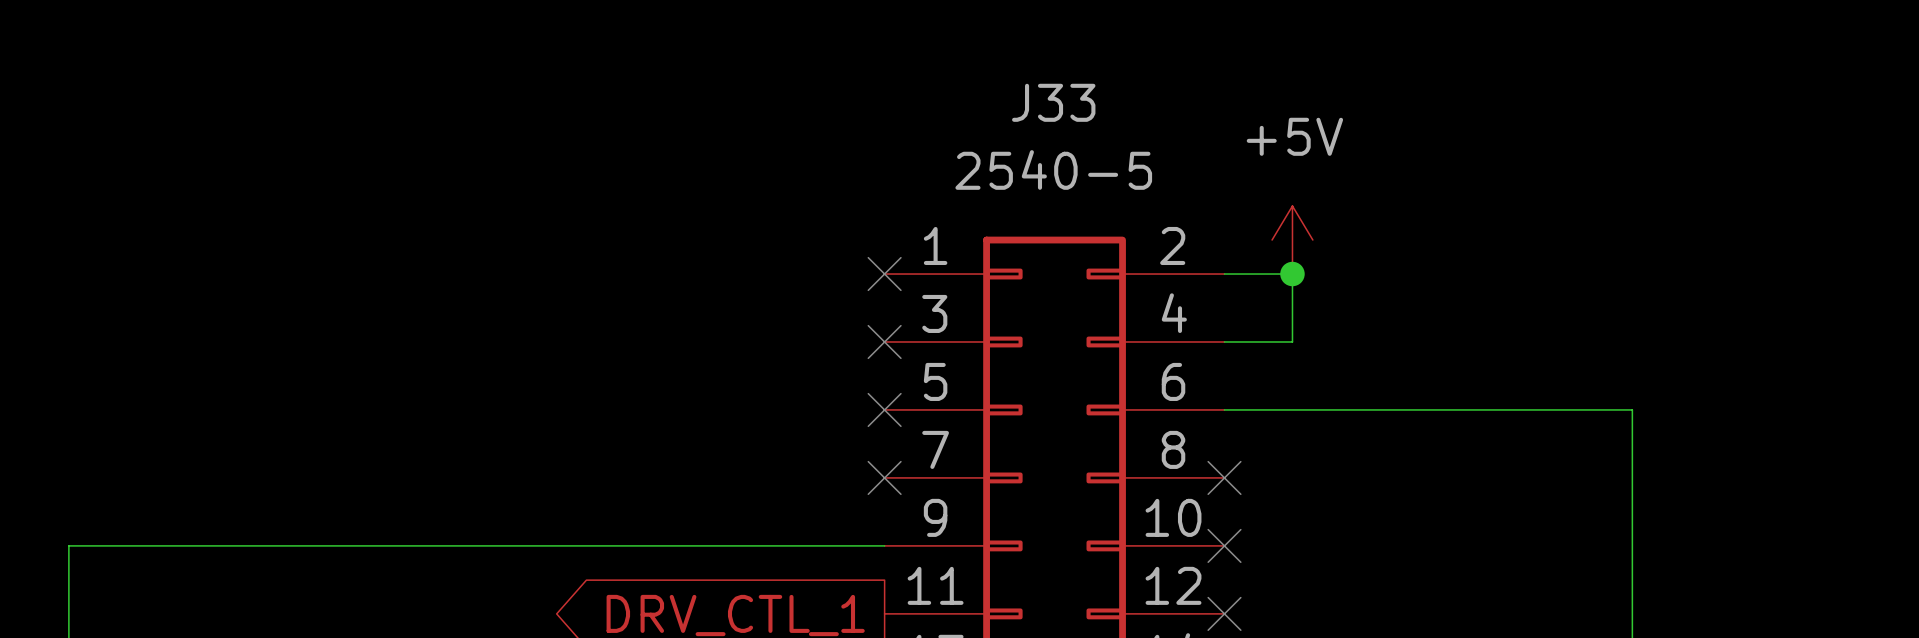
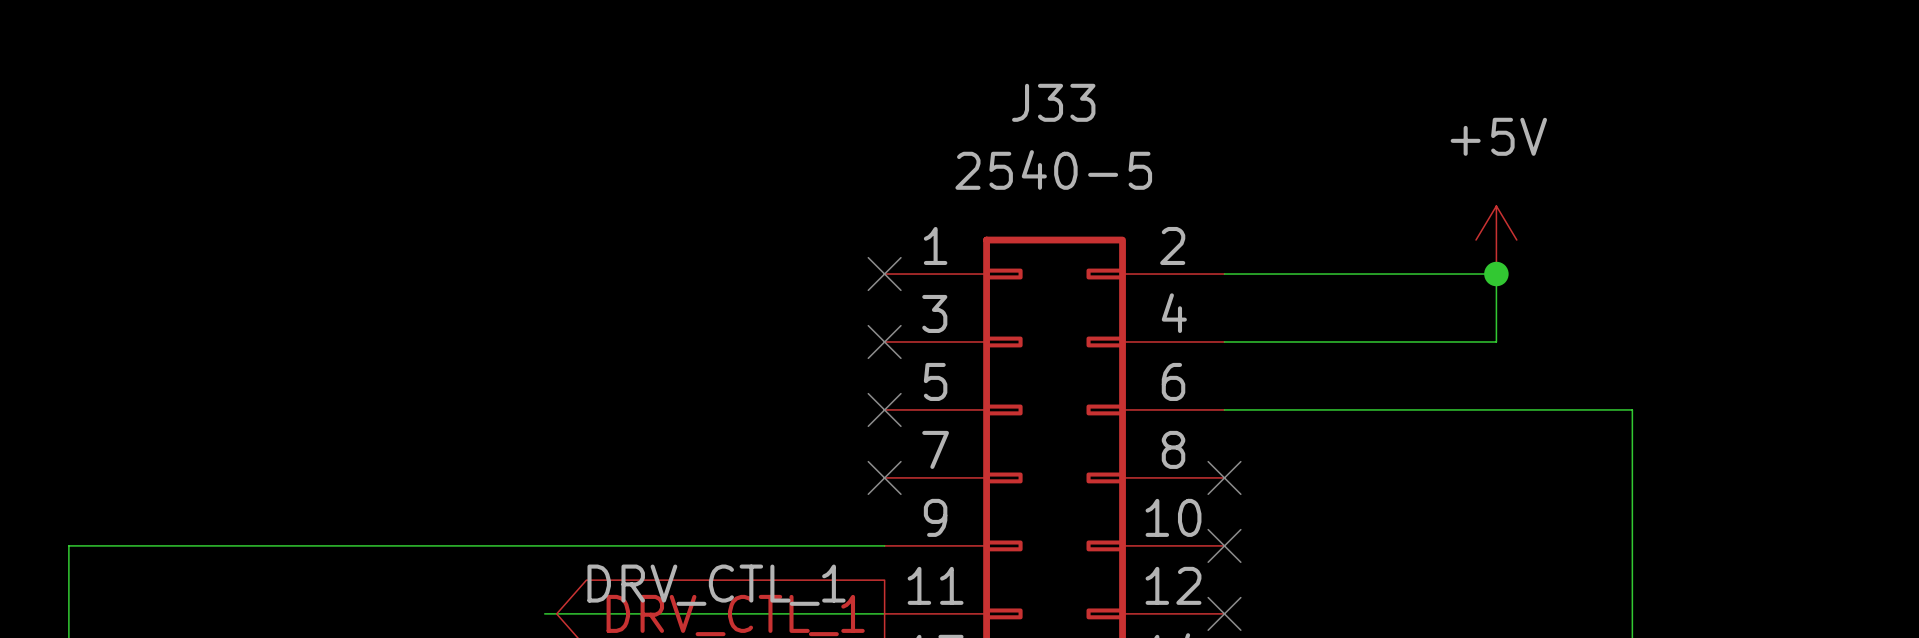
power symbol position: +5V (1292, 240) -> +5V (1496, 240)
wire: (1292, 274) (1292, 341) -> (1292, 274) (1496, 274) (1496, 341) (1292, 341)
junction: (1292, 274) -> none
junction: none -> (1496, 274)
label: none -> DRV_CTL_1 (716, 585)
wire: none -> (544, 613) (884, 613)

